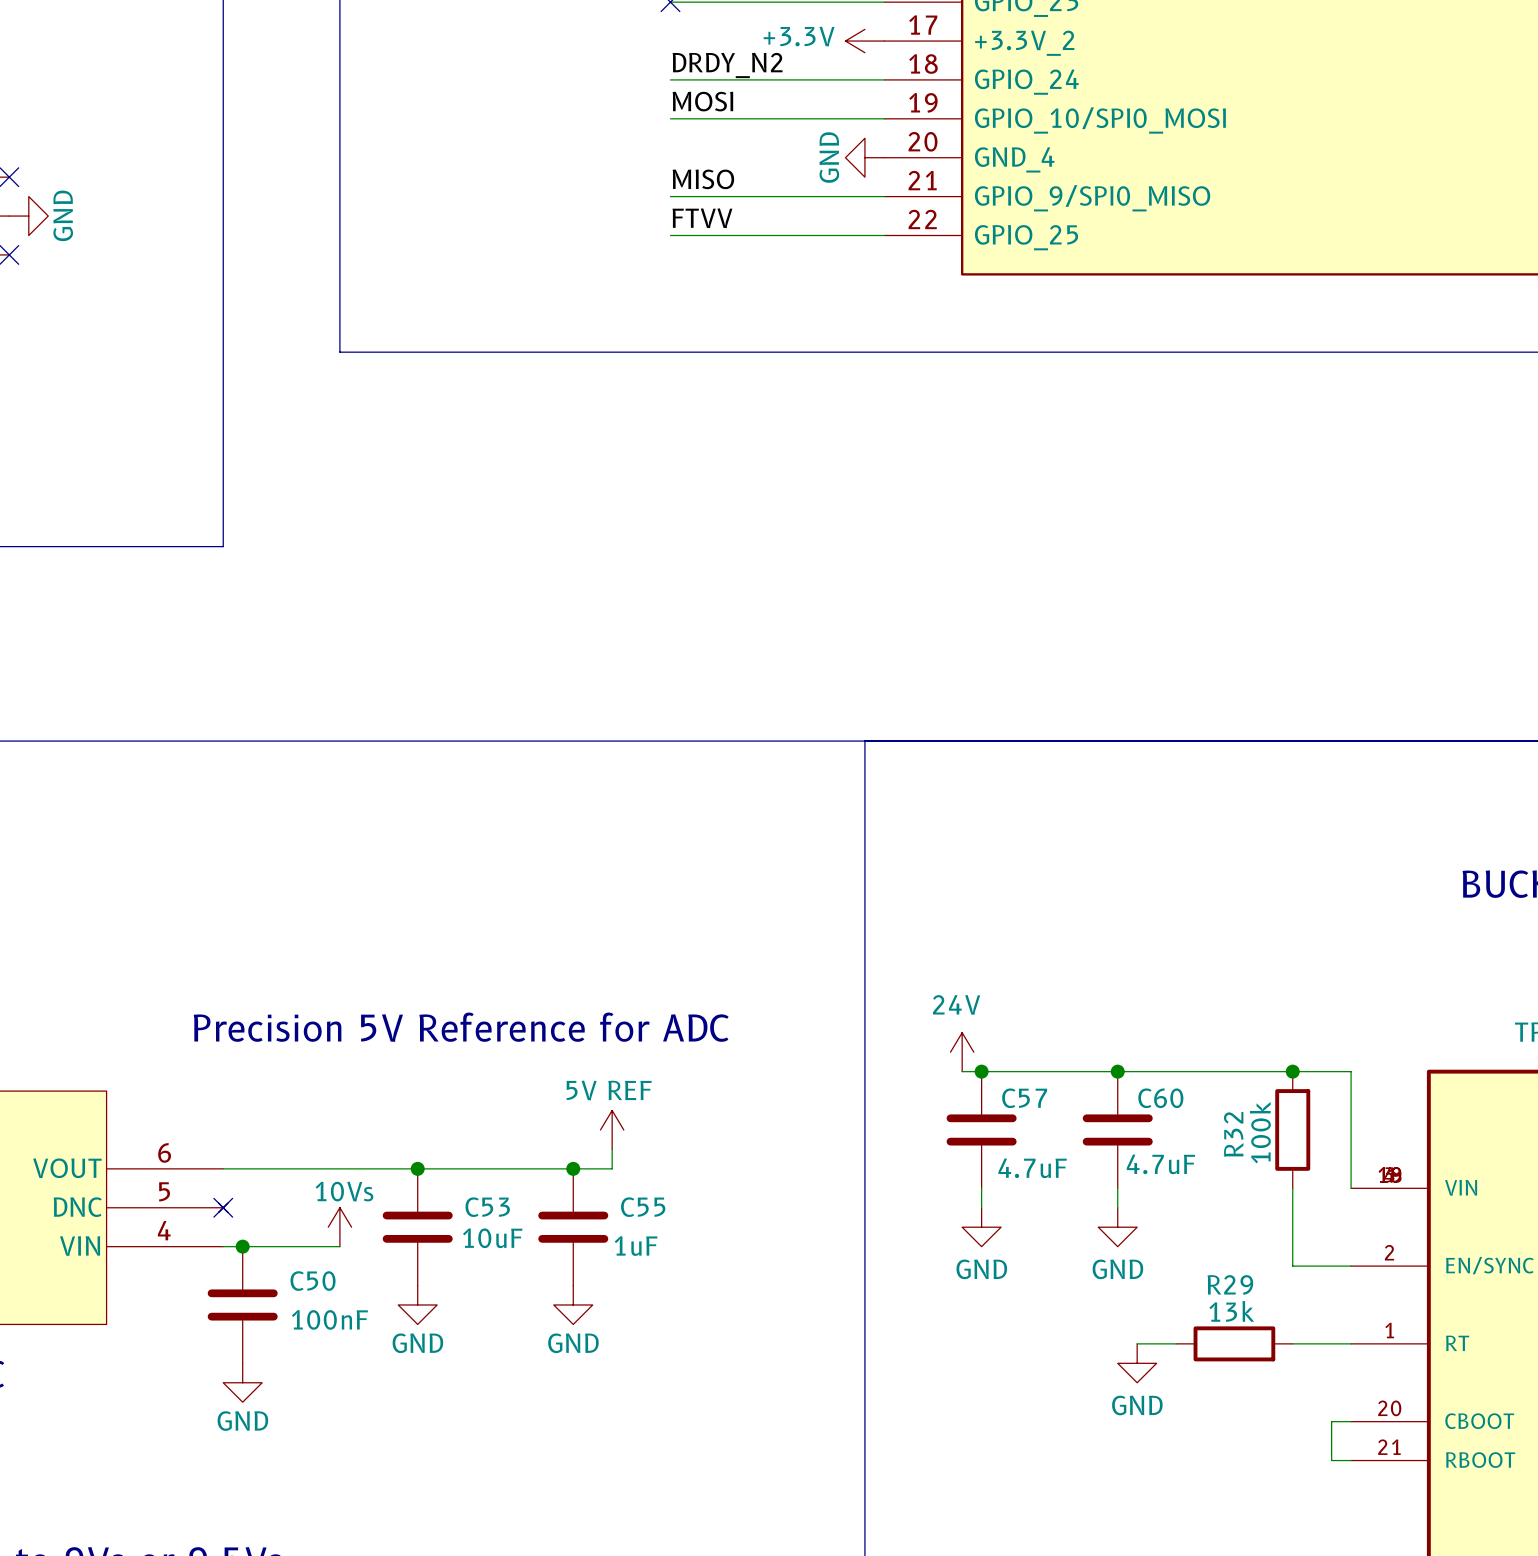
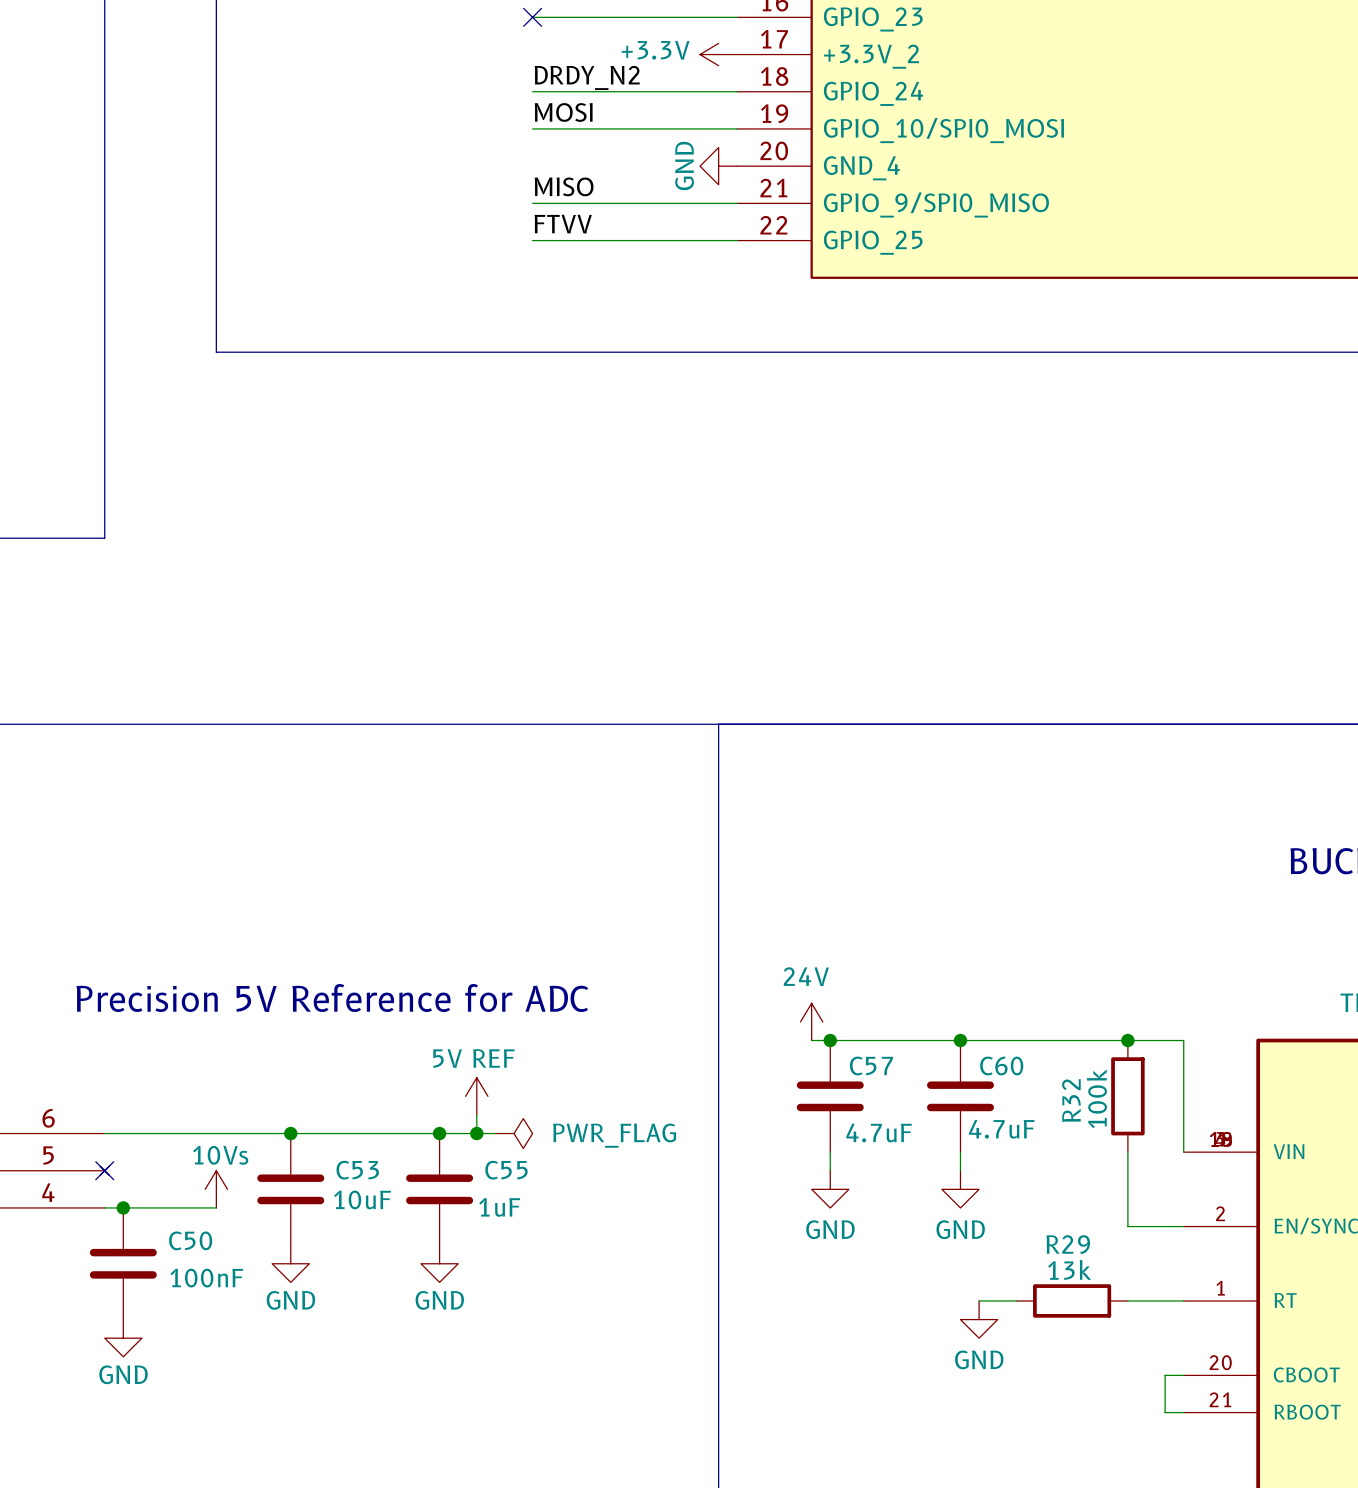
wire: none -> (476, 1133) (495, 1133)
junction: none -> (476, 1133)
power symbol: none -> PWR_FLAG (514, 1133)

